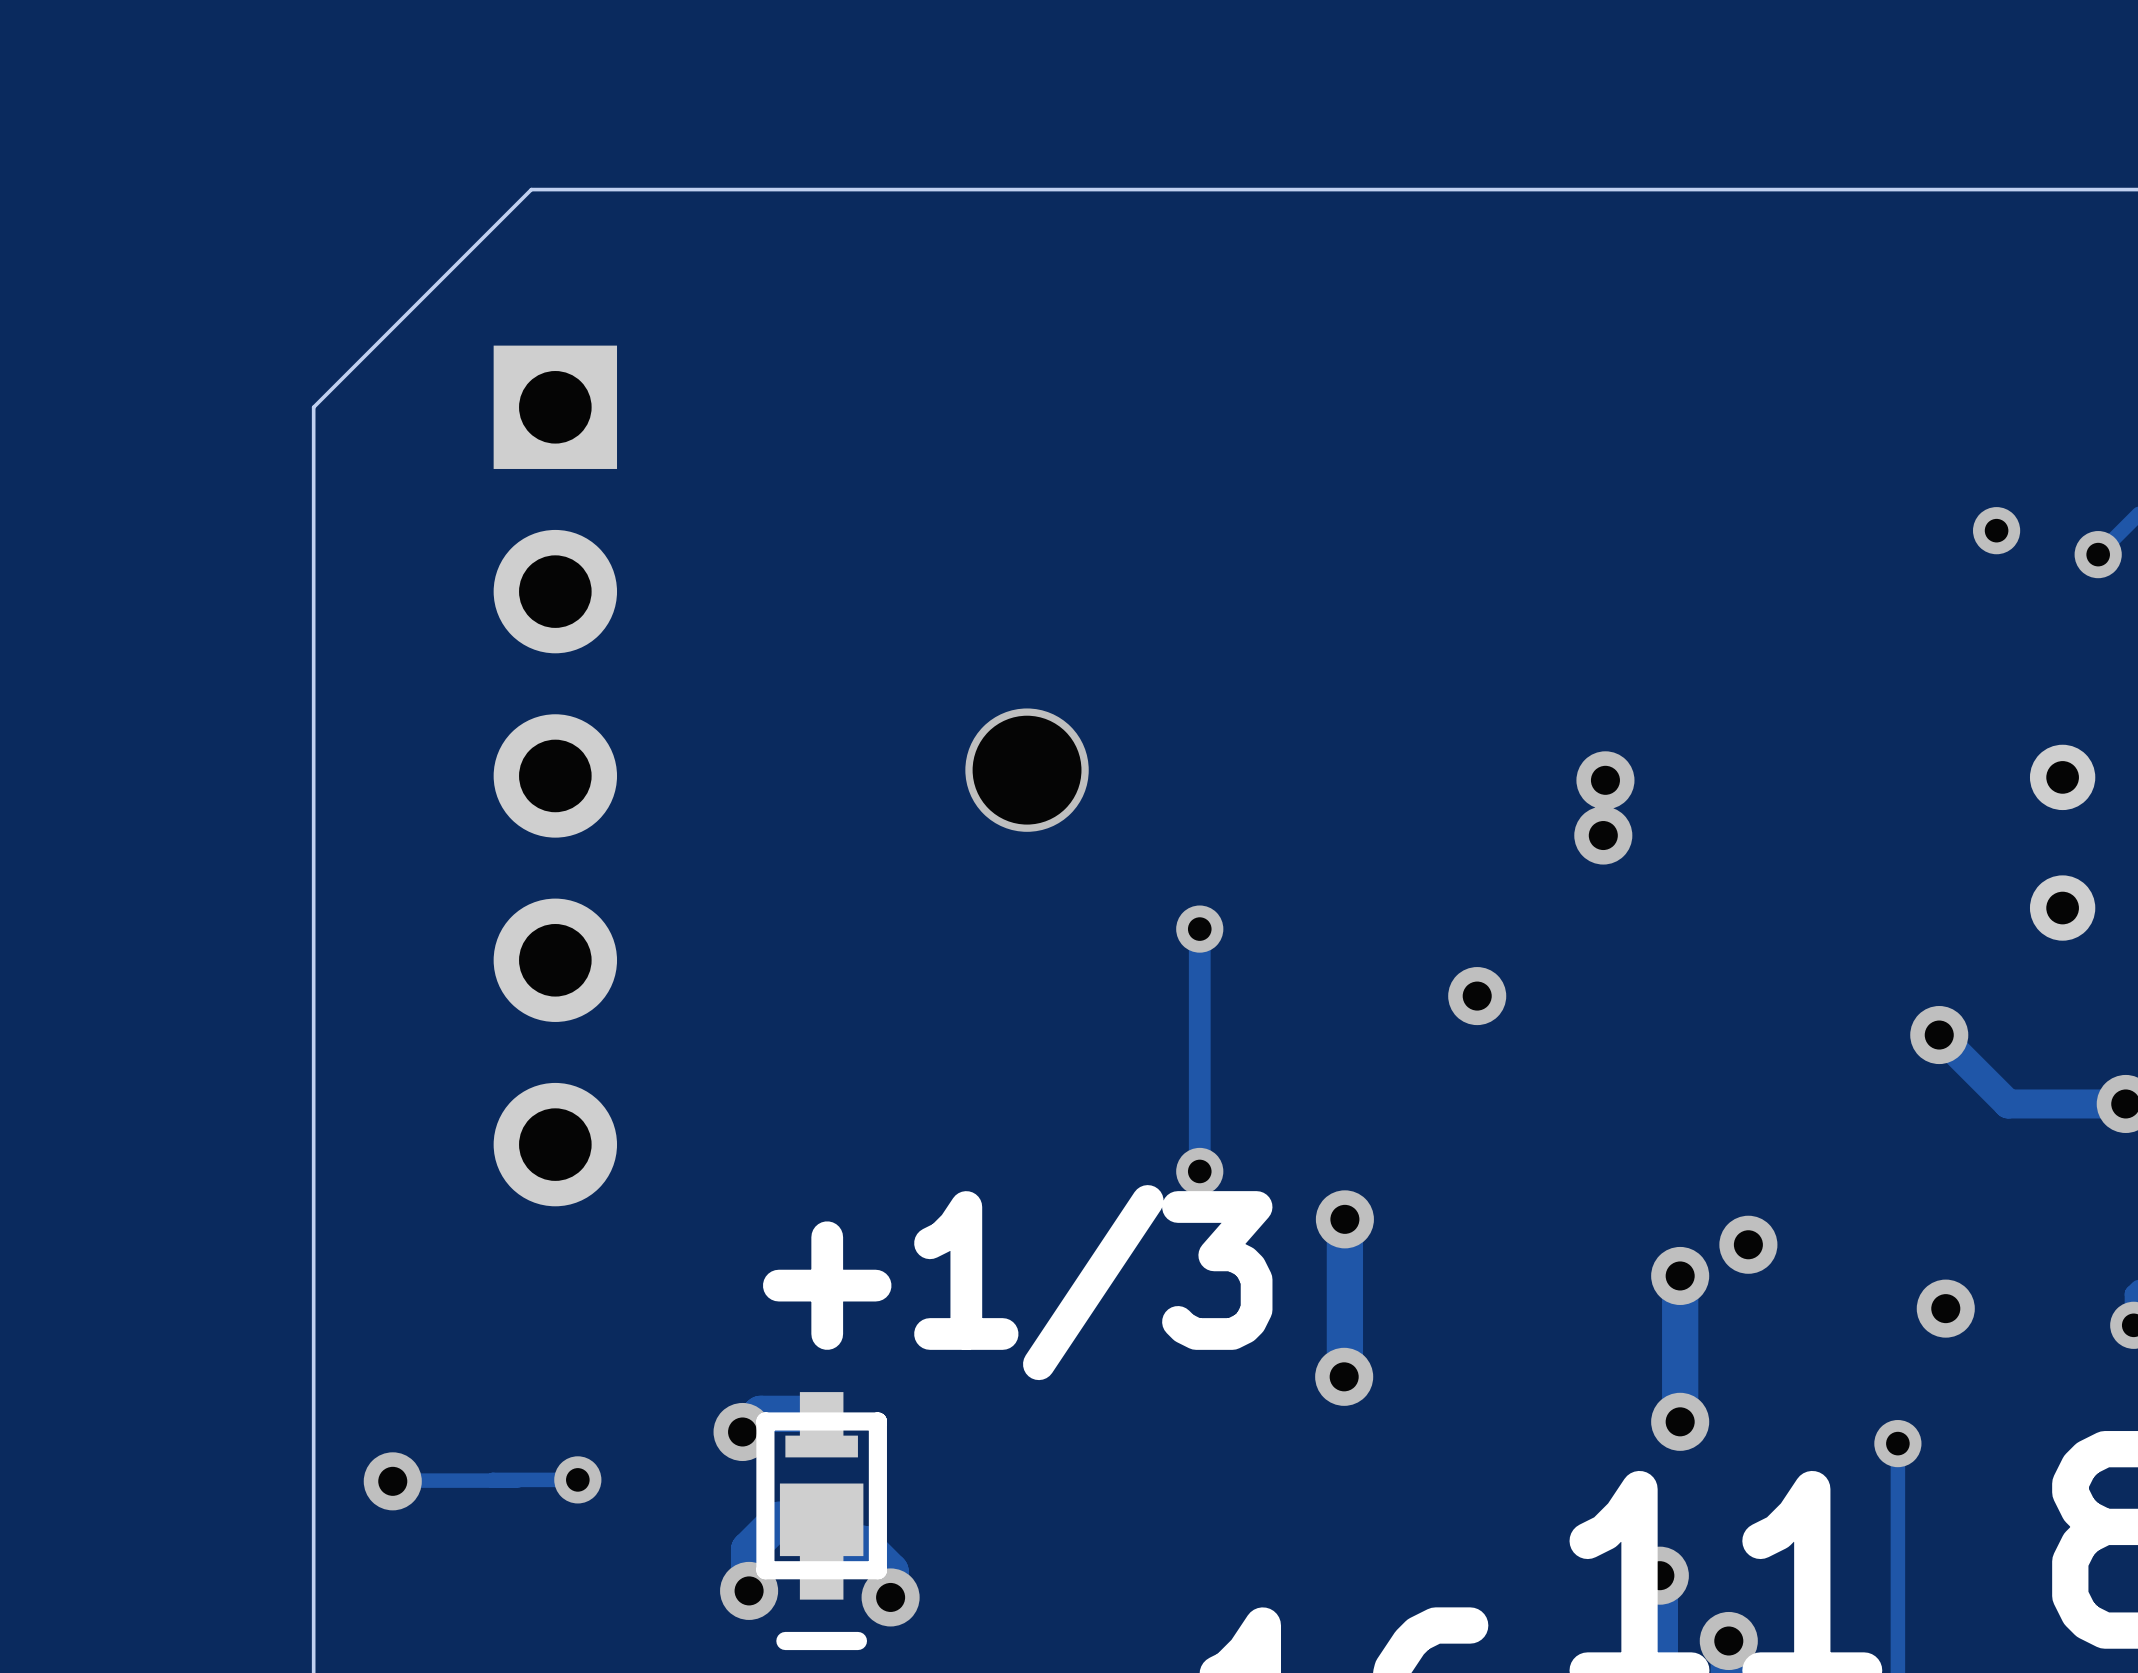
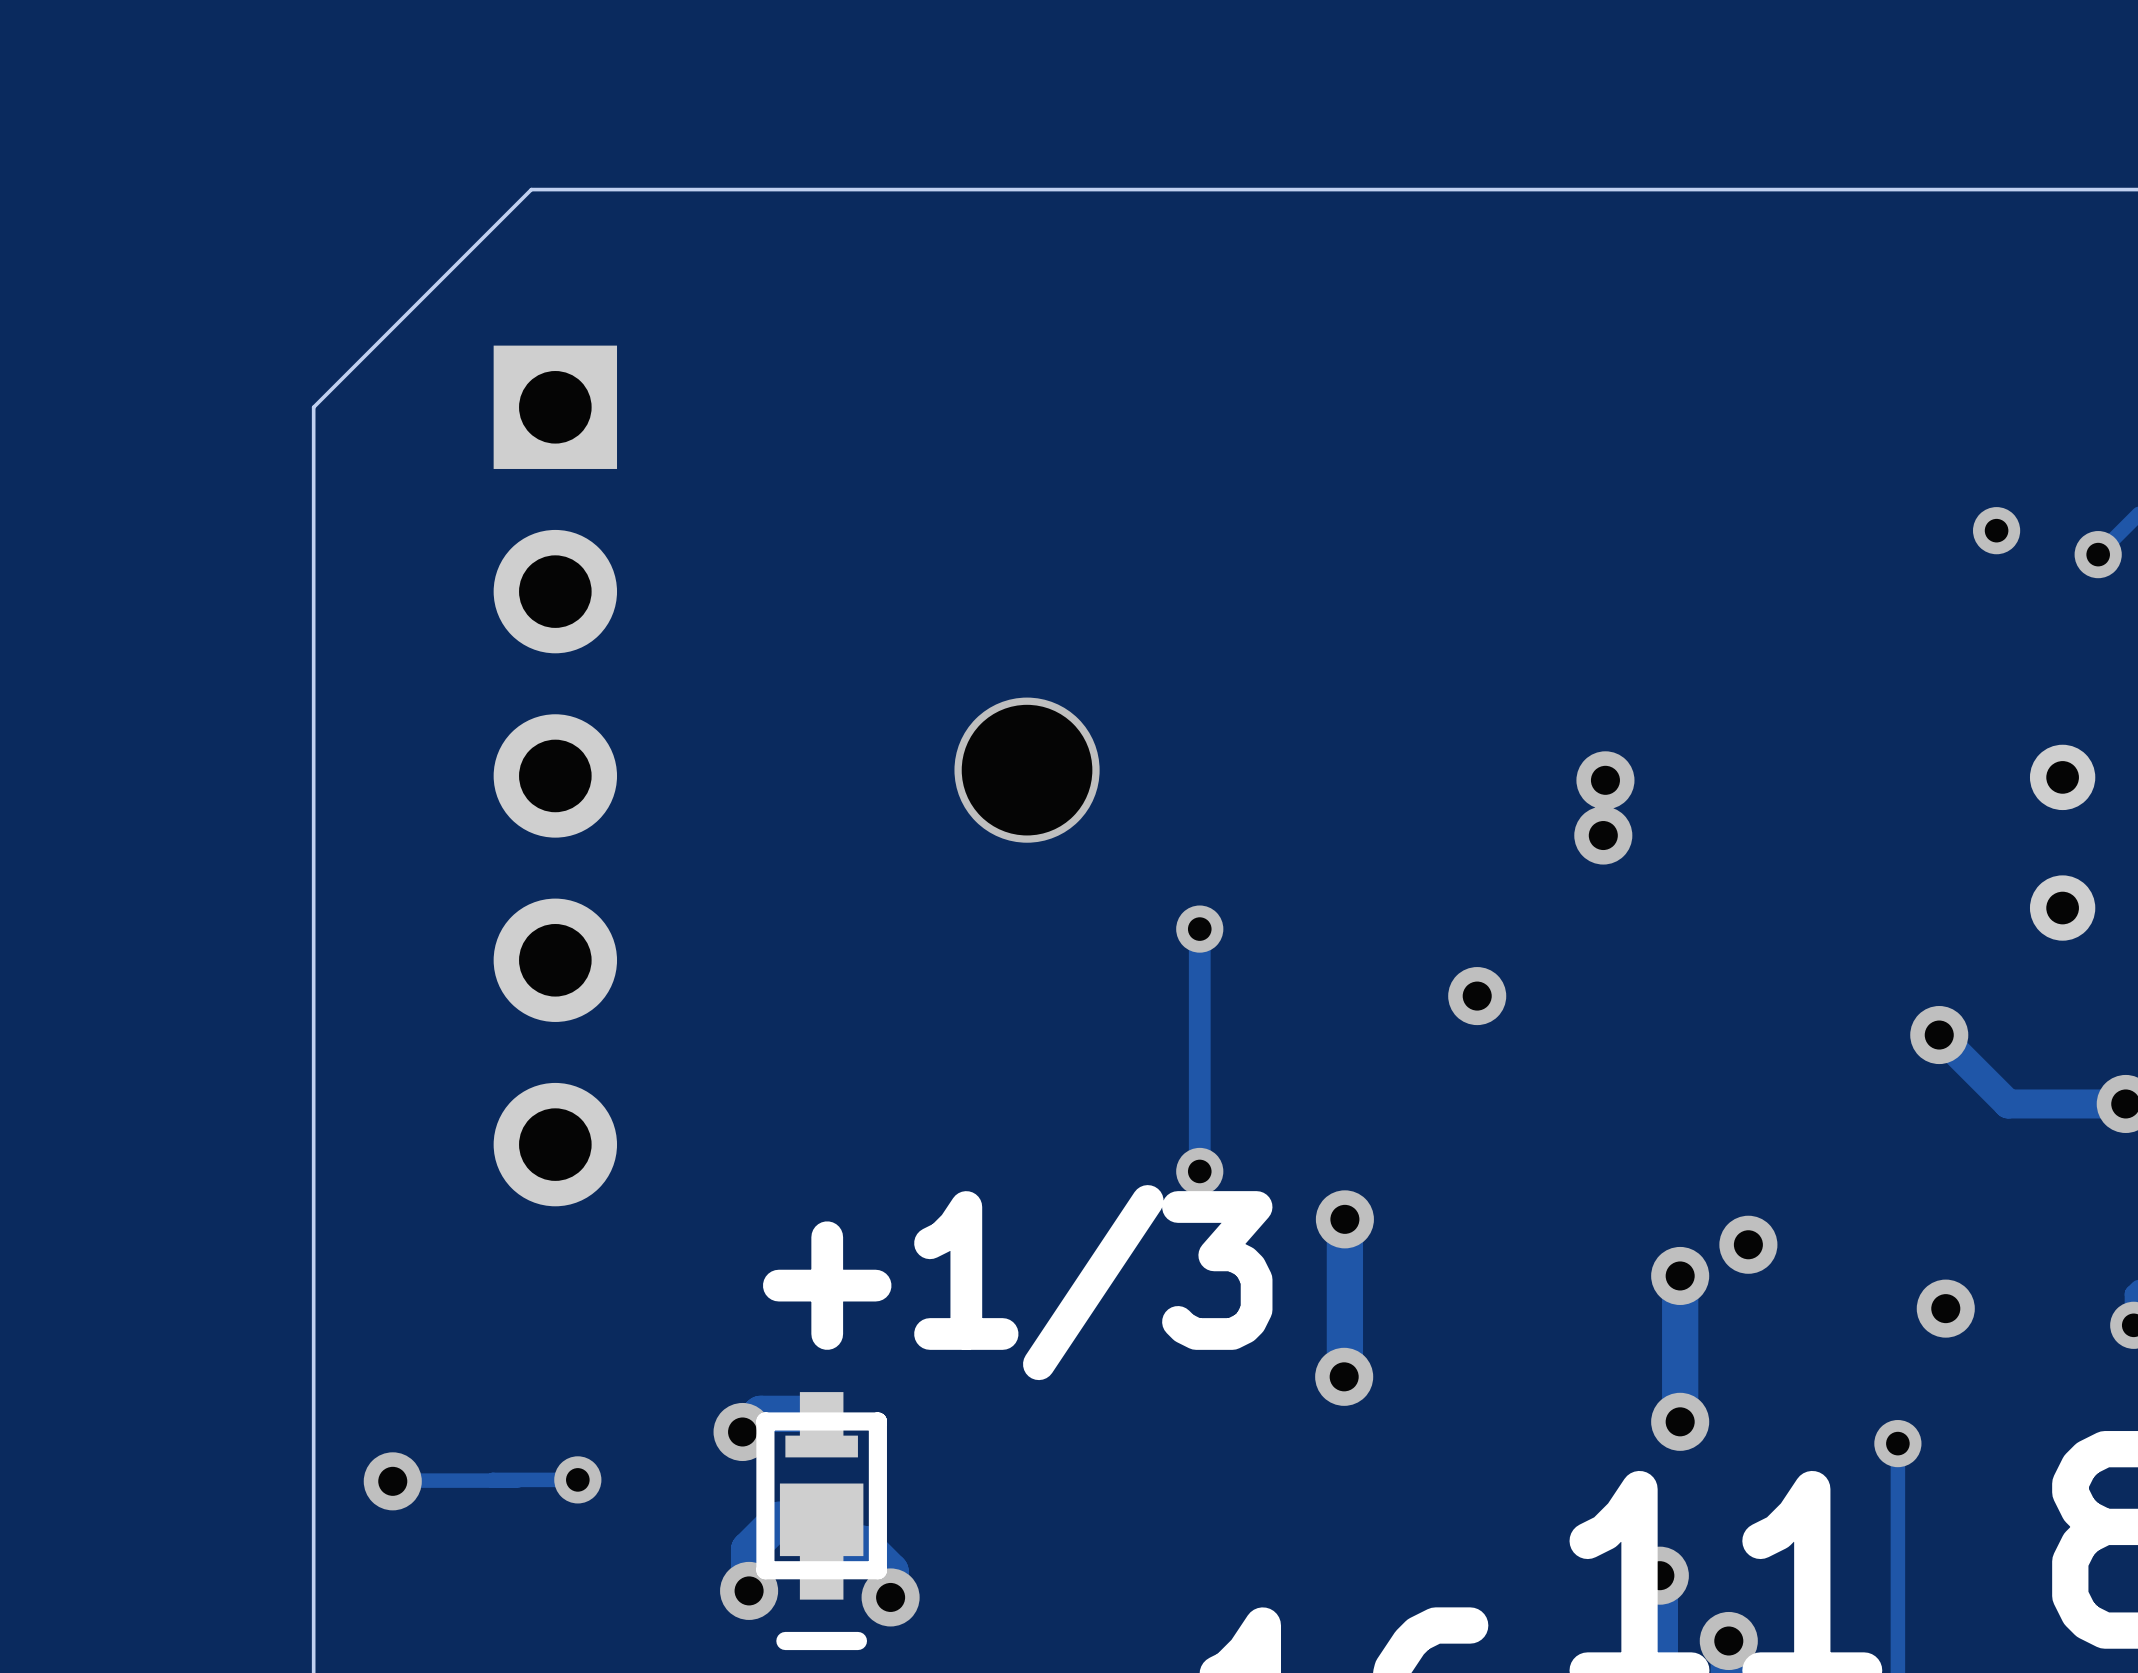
via size: [965, 708, 1089, 832] -> [954, 697, 1100, 843]

